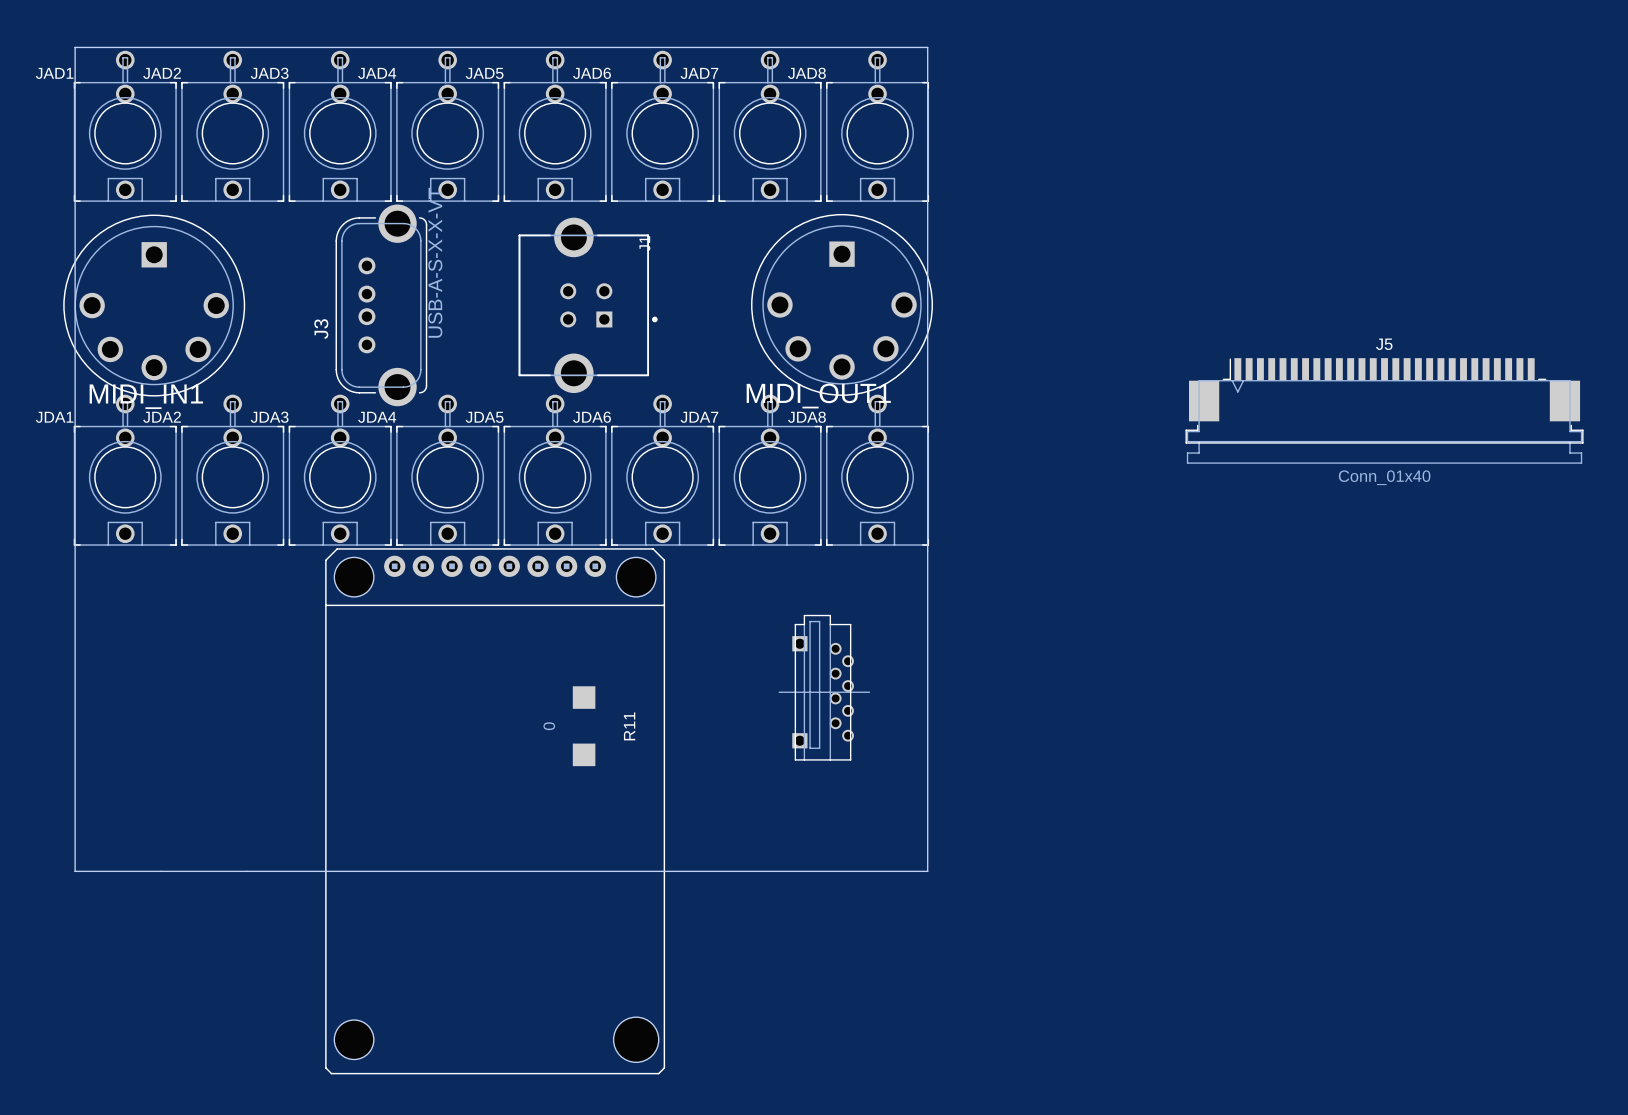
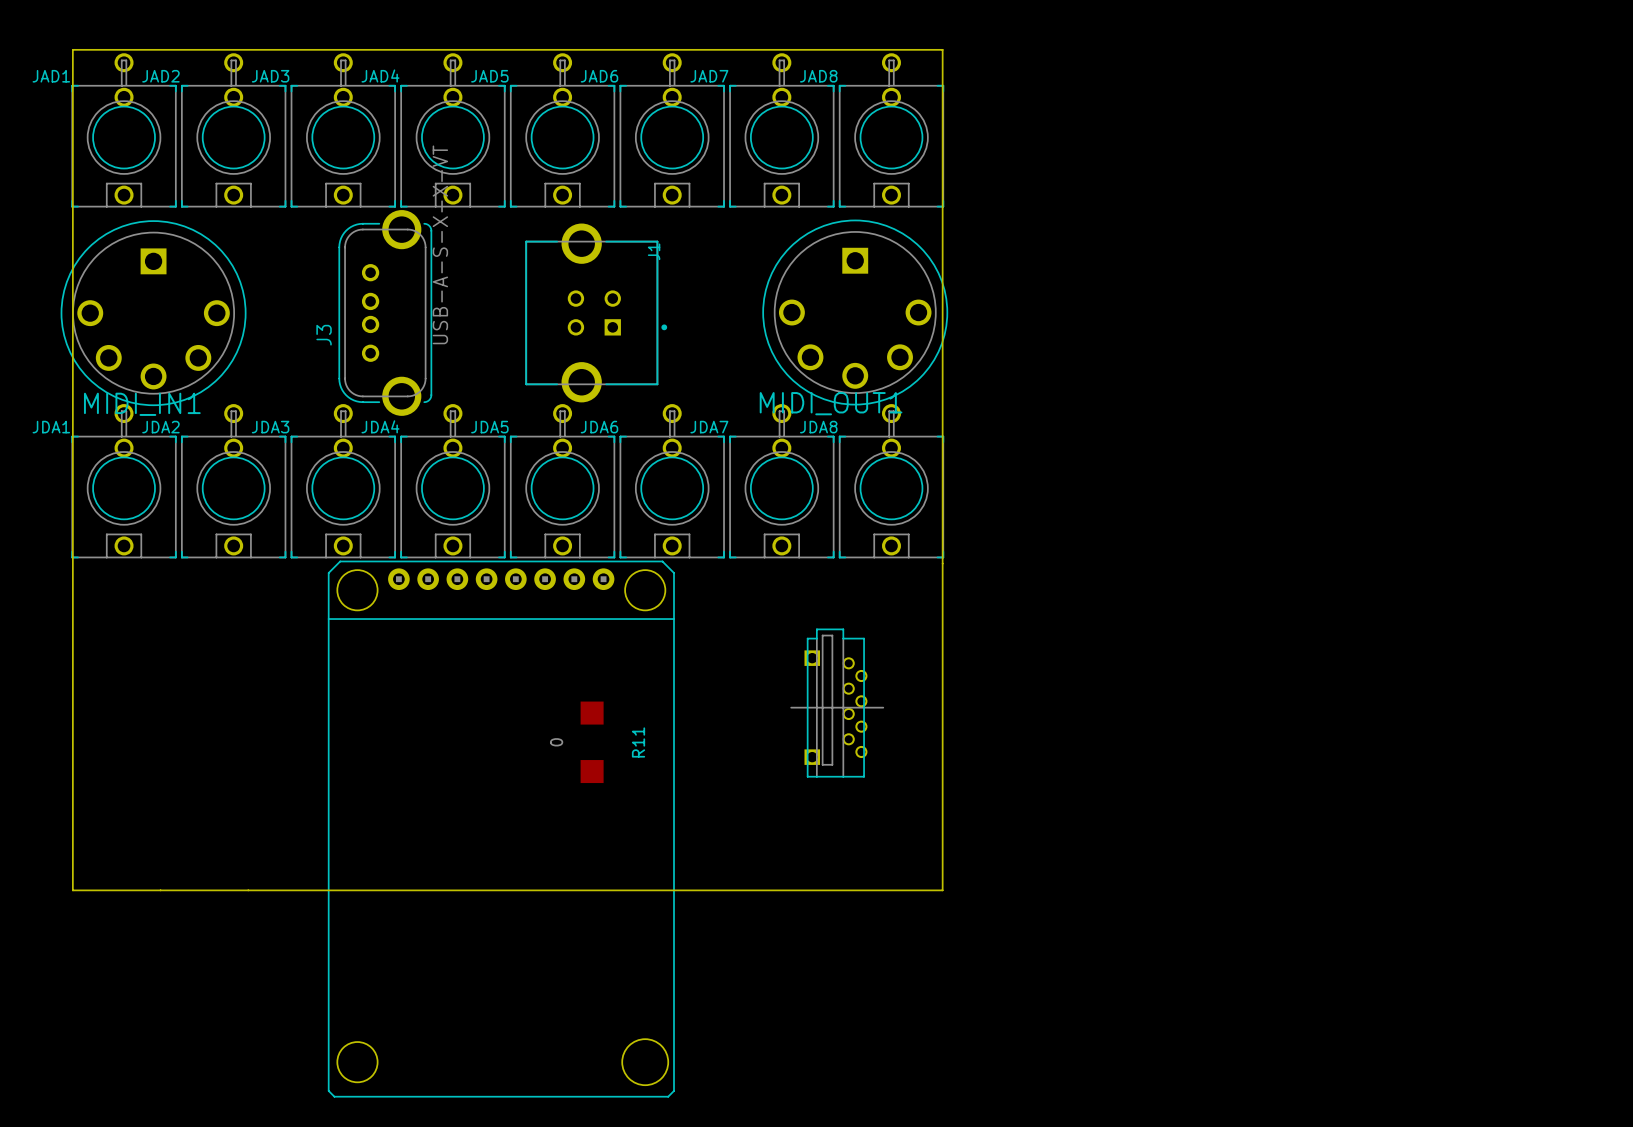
J5: Conn_01x40 (1384, 410) -> none

